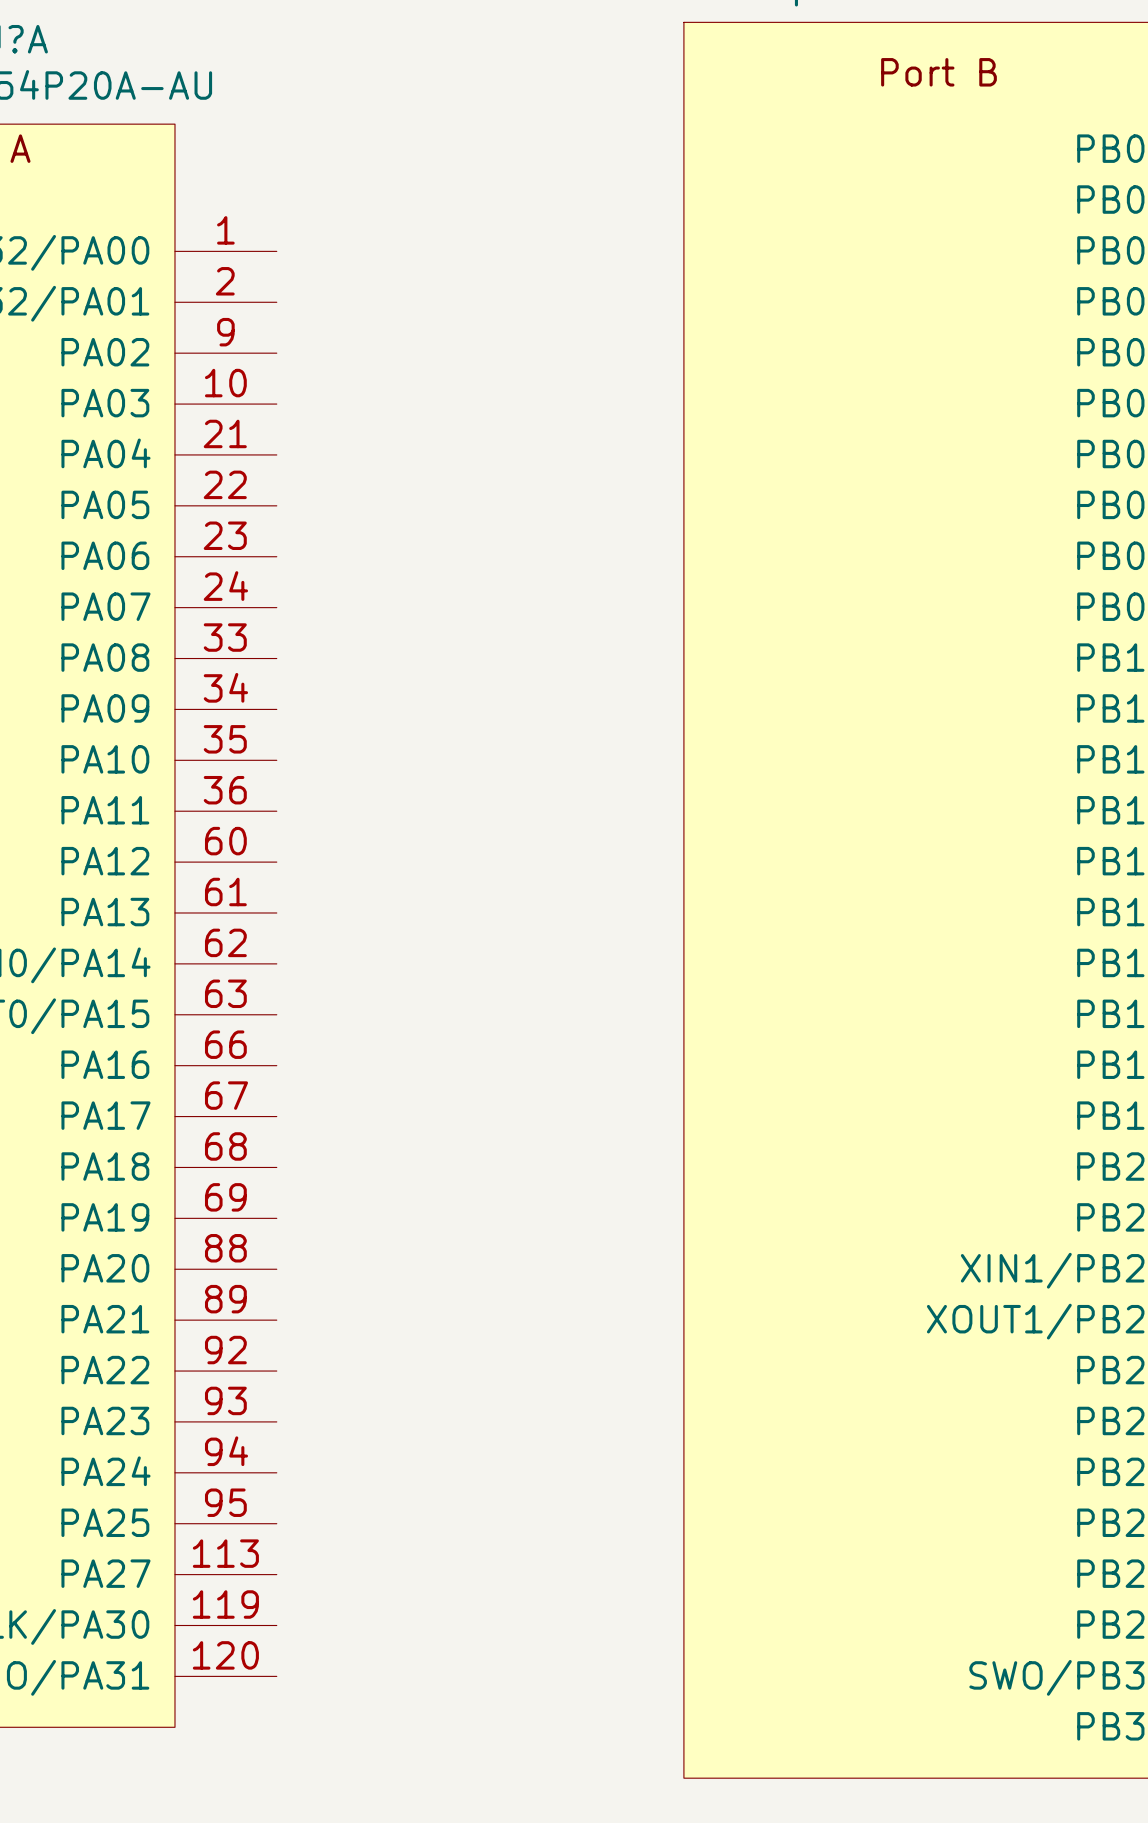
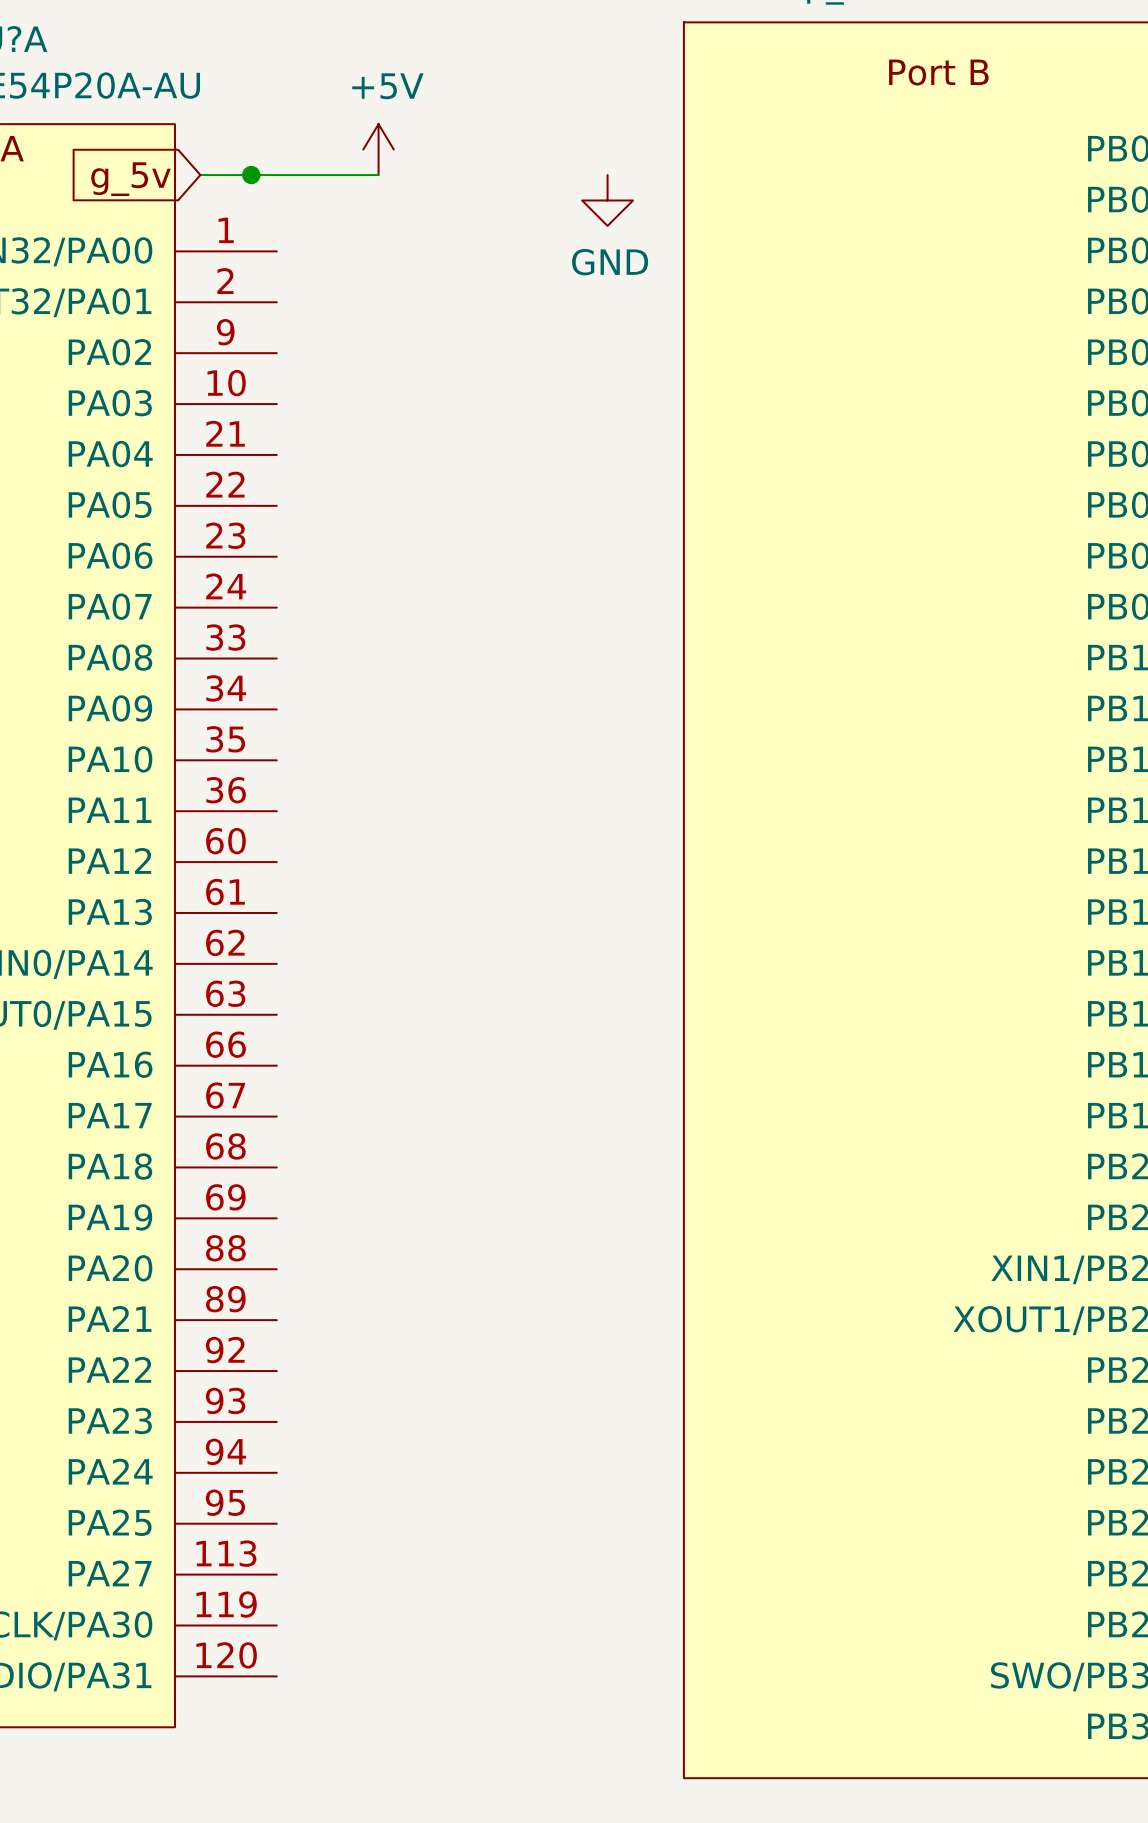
power symbol: none -> +5V (378, 149)
wire: none -> (200, 175) (378, 175)
junction: none -> (251, 175)
global label: none -> g_5v (131, 179)
power symbol: none -> GND (607, 200)

